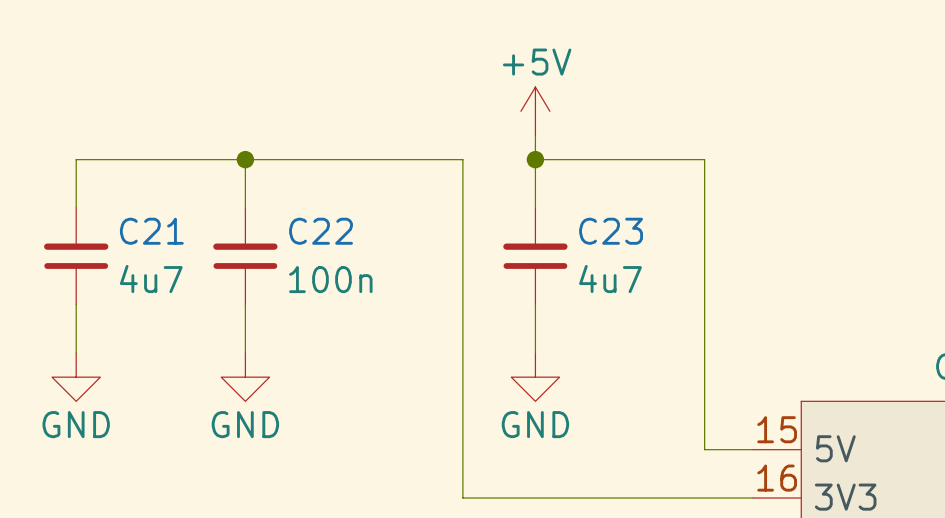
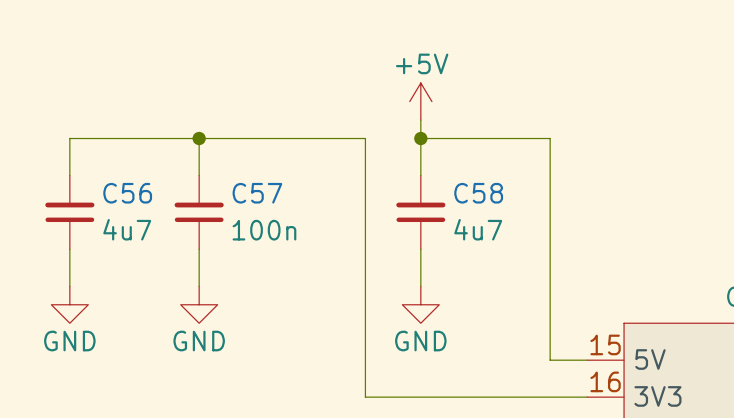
C21 name: C21 (151, 231) -> C56 (127, 193)
C22 name: C22 (321, 231) -> C57 (257, 193)
C23 name: C23 (611, 231) -> C58 (478, 193)

